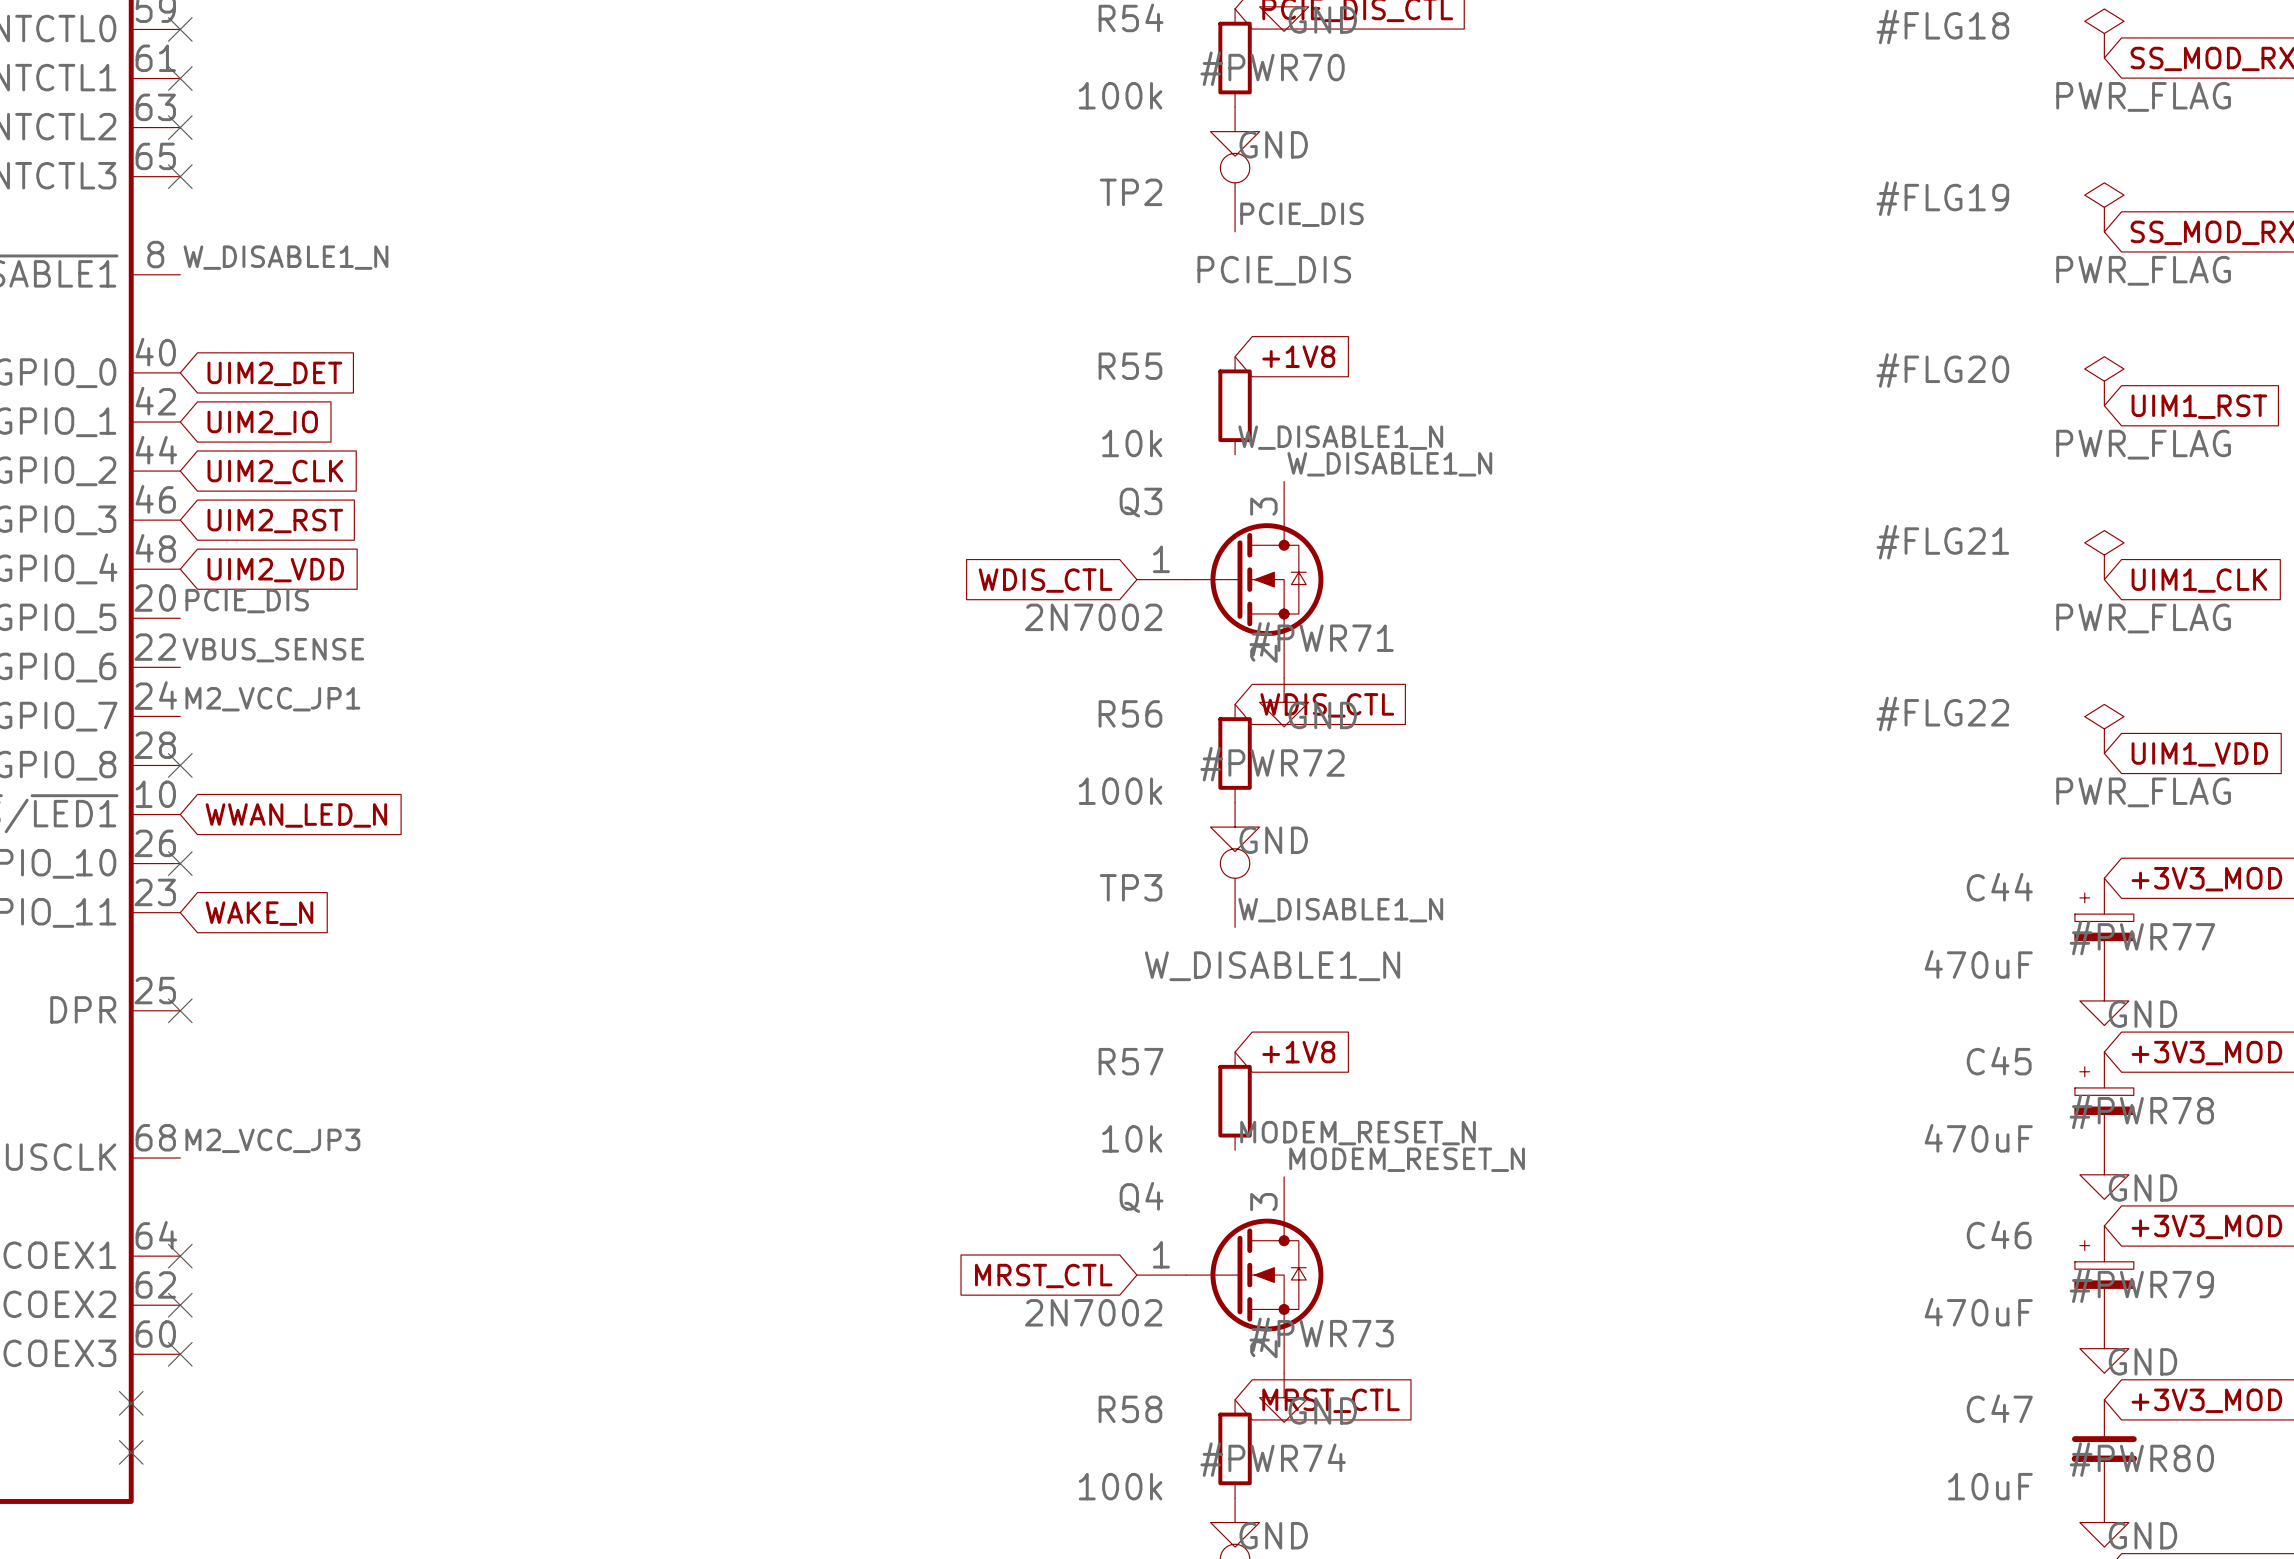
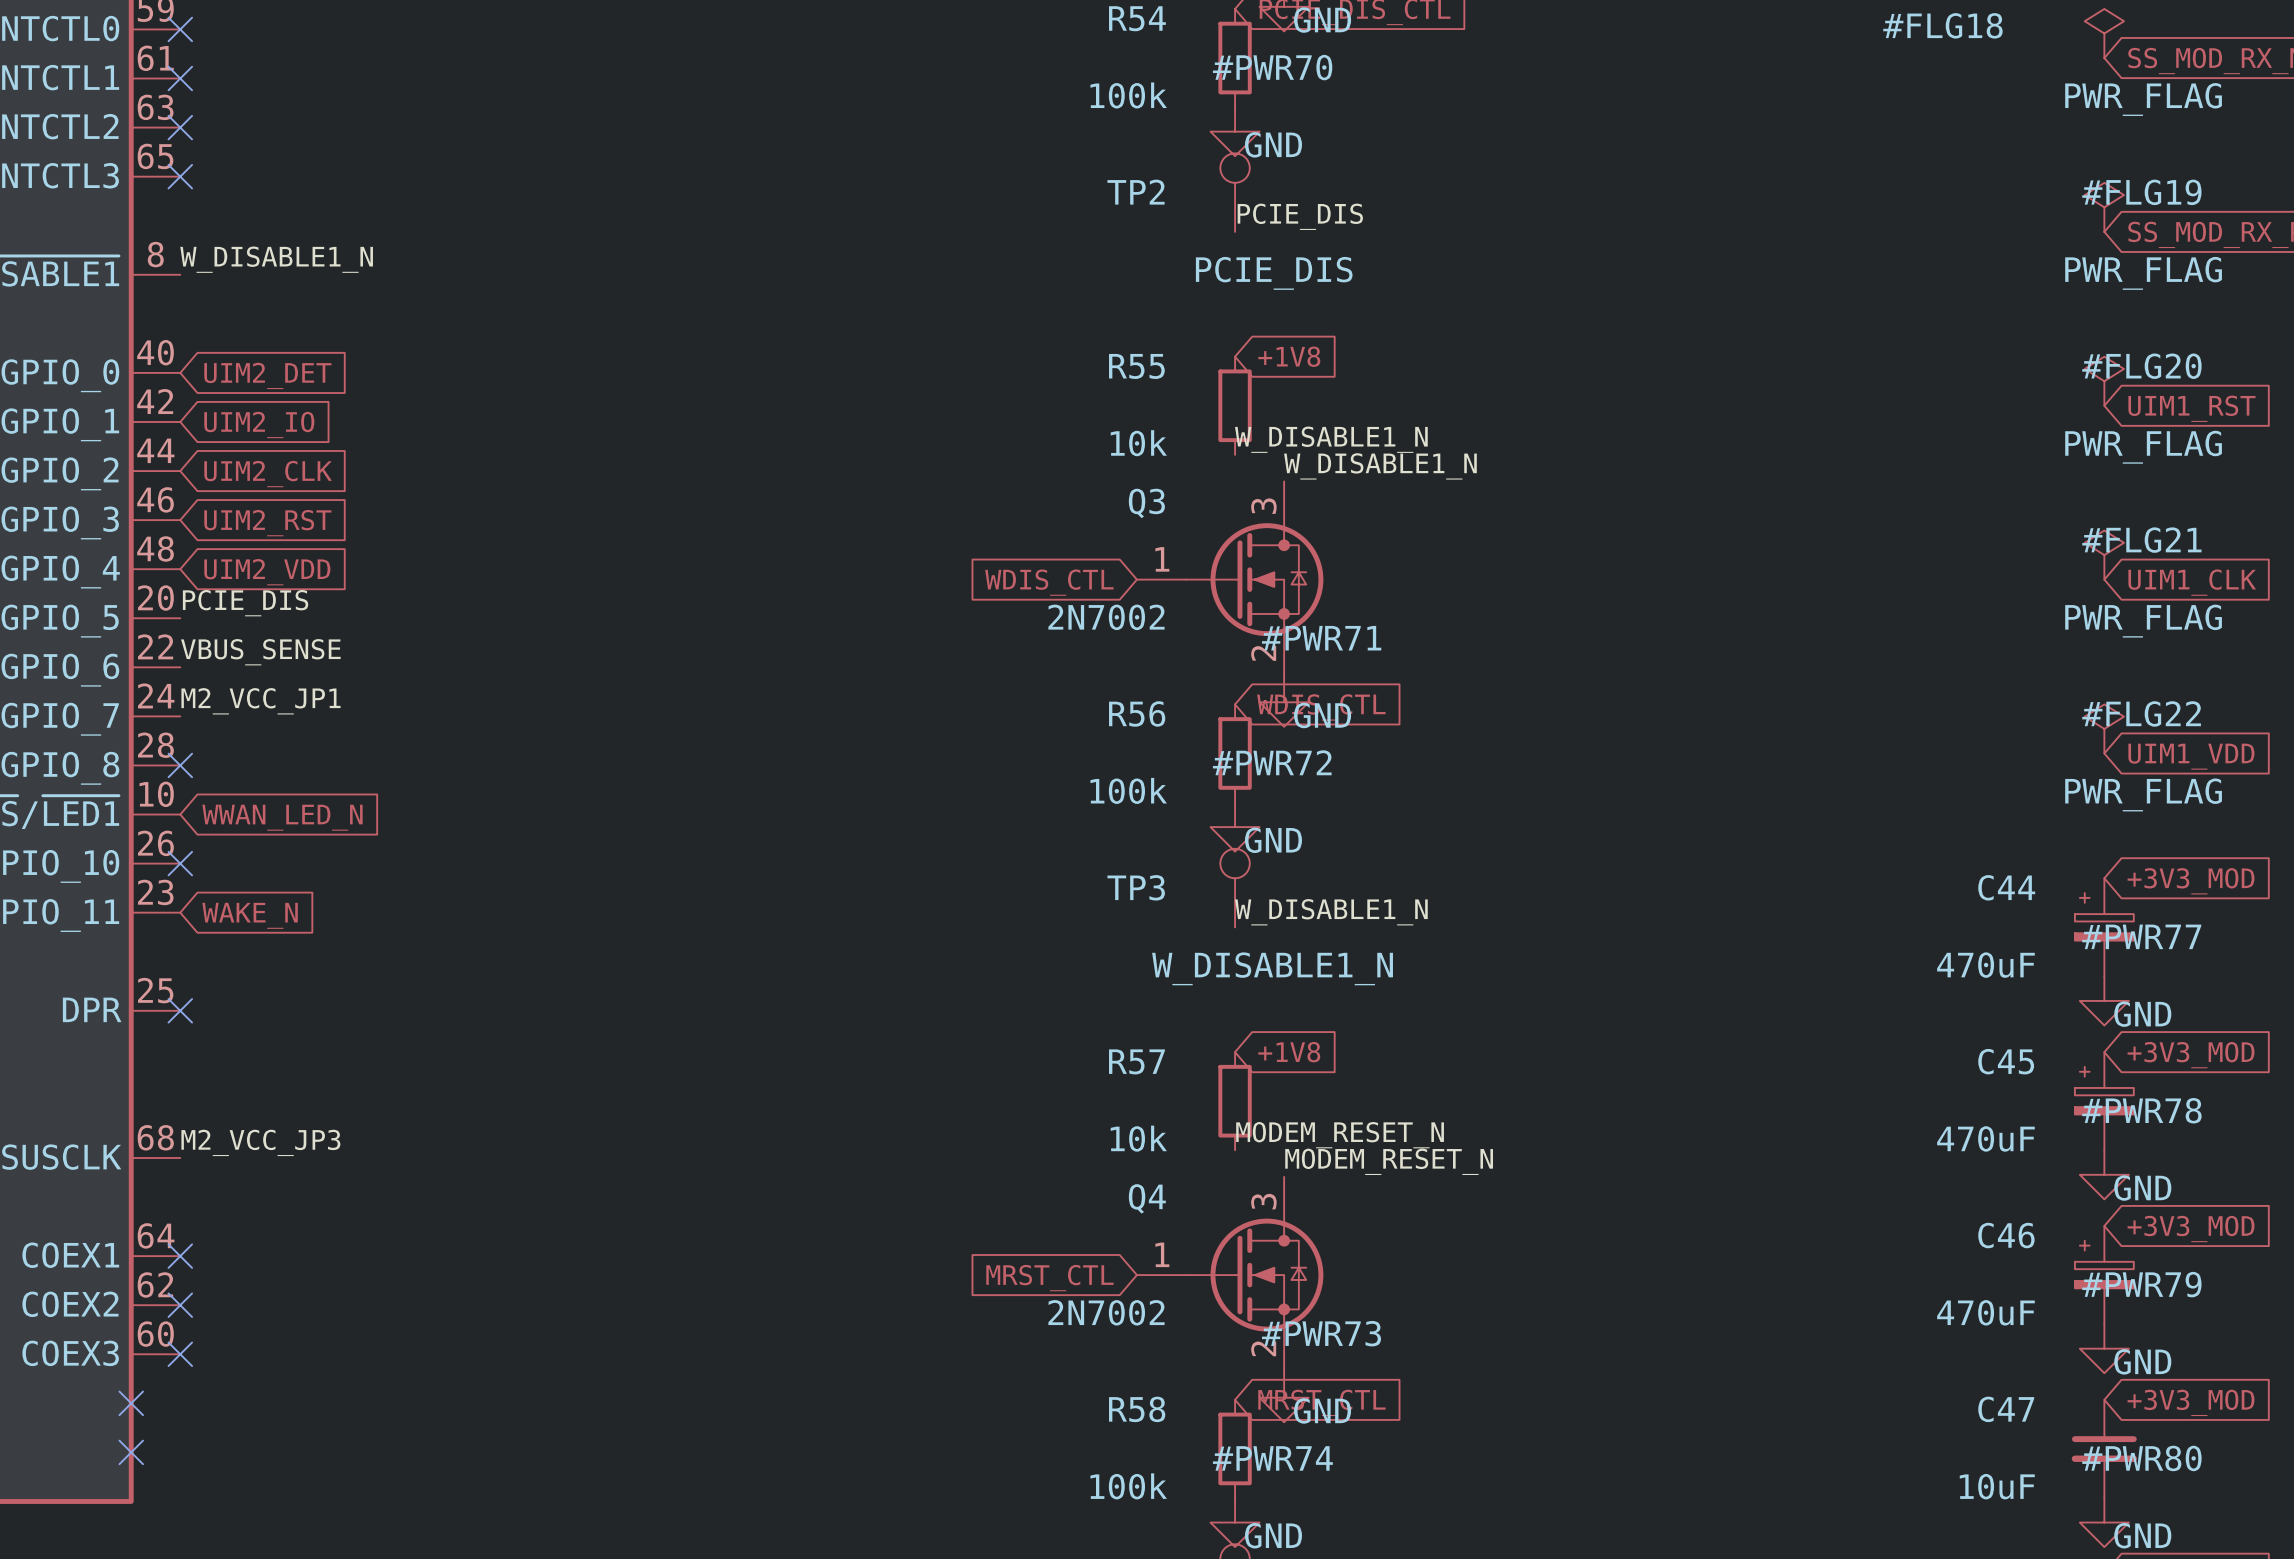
#FLG19 name position: #FLG19 (1942, 198) -> #FLG19 (2141, 192)
#FLG20 name position: #FLG20 (1942, 370) -> #FLG20 (2141, 366)
#FLG21 name position: #FLG21 (1942, 542) -> #FLG21 (2141, 540)
#FLG22 name position: #FLG22 (1942, 713) -> #FLG22 (2141, 713)

